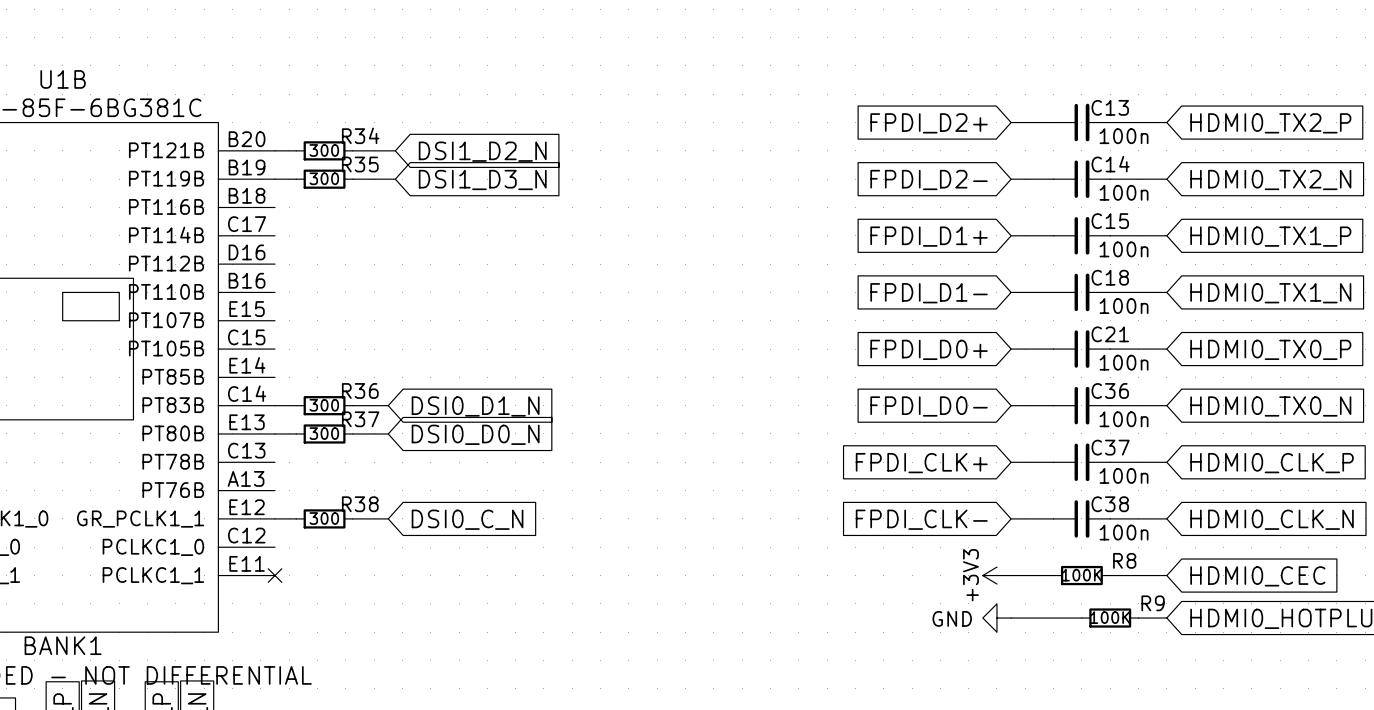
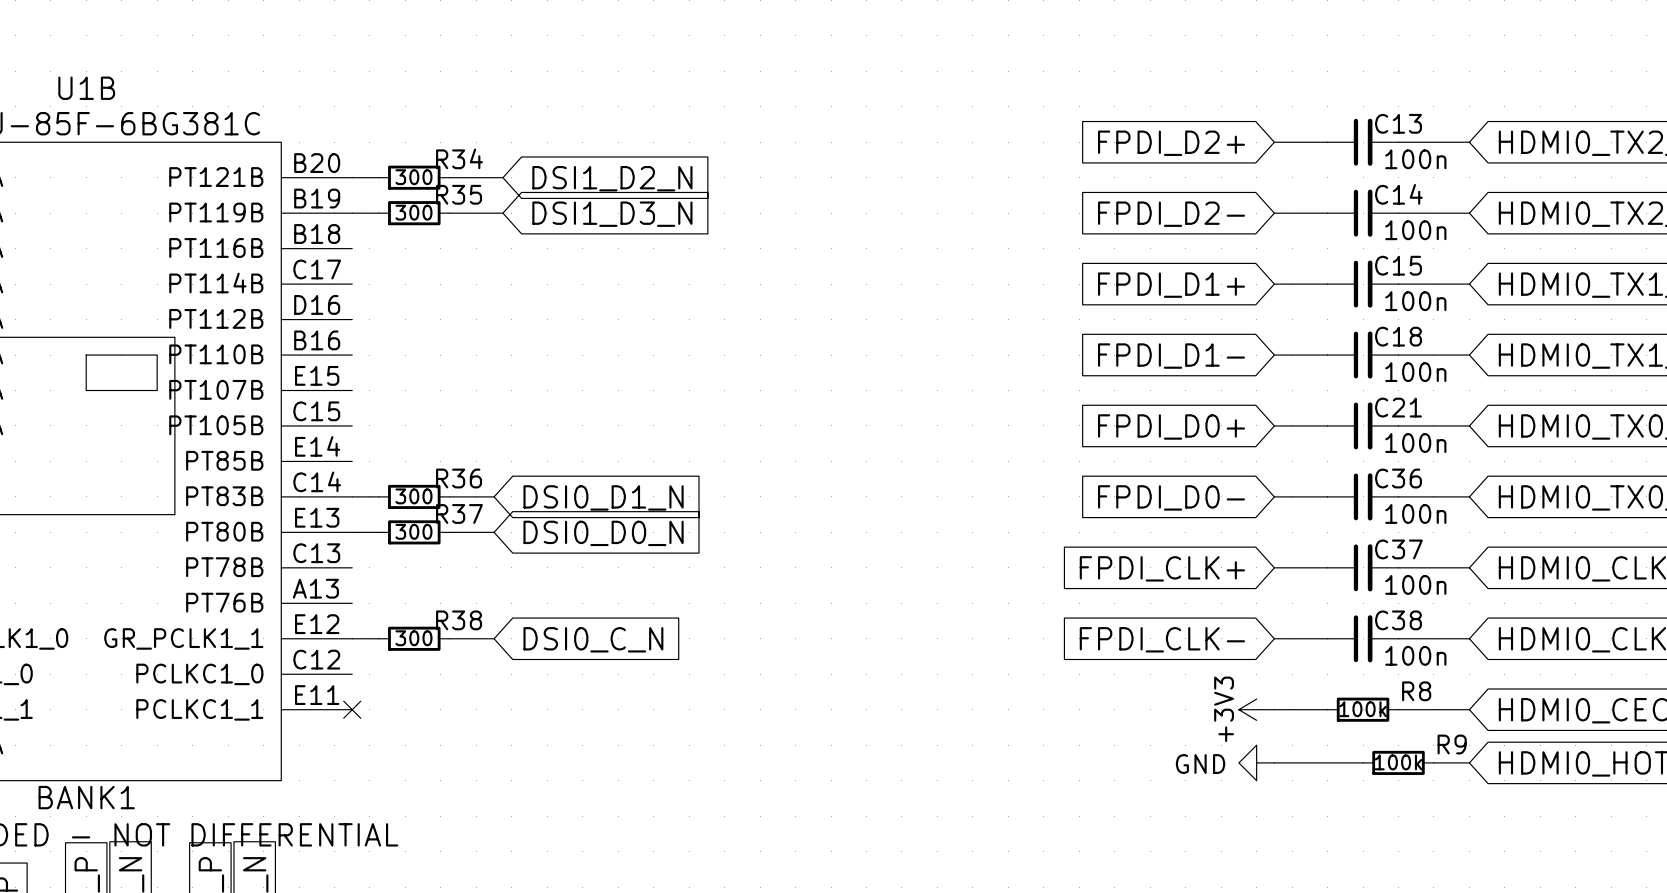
R8 value: 100K (1081, 575) -> 100k (1363, 709)
R9 value: 100K (1110, 617) -> 100k (1398, 762)

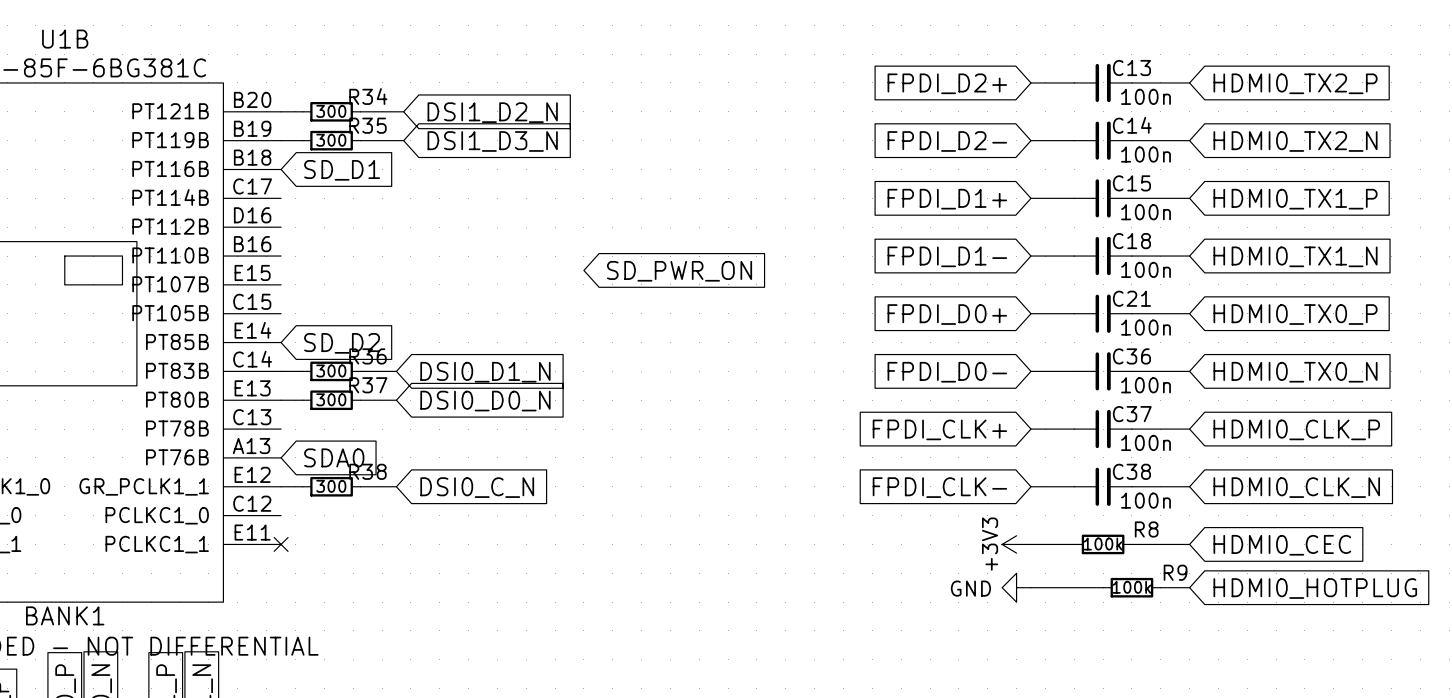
global label: none -> SD_D1 (342, 170)
global label: none -> SD_PWR_ON (679, 271)
global label: none -> SD_D2 (342, 343)
global label: none -> SDA0 (334, 457)

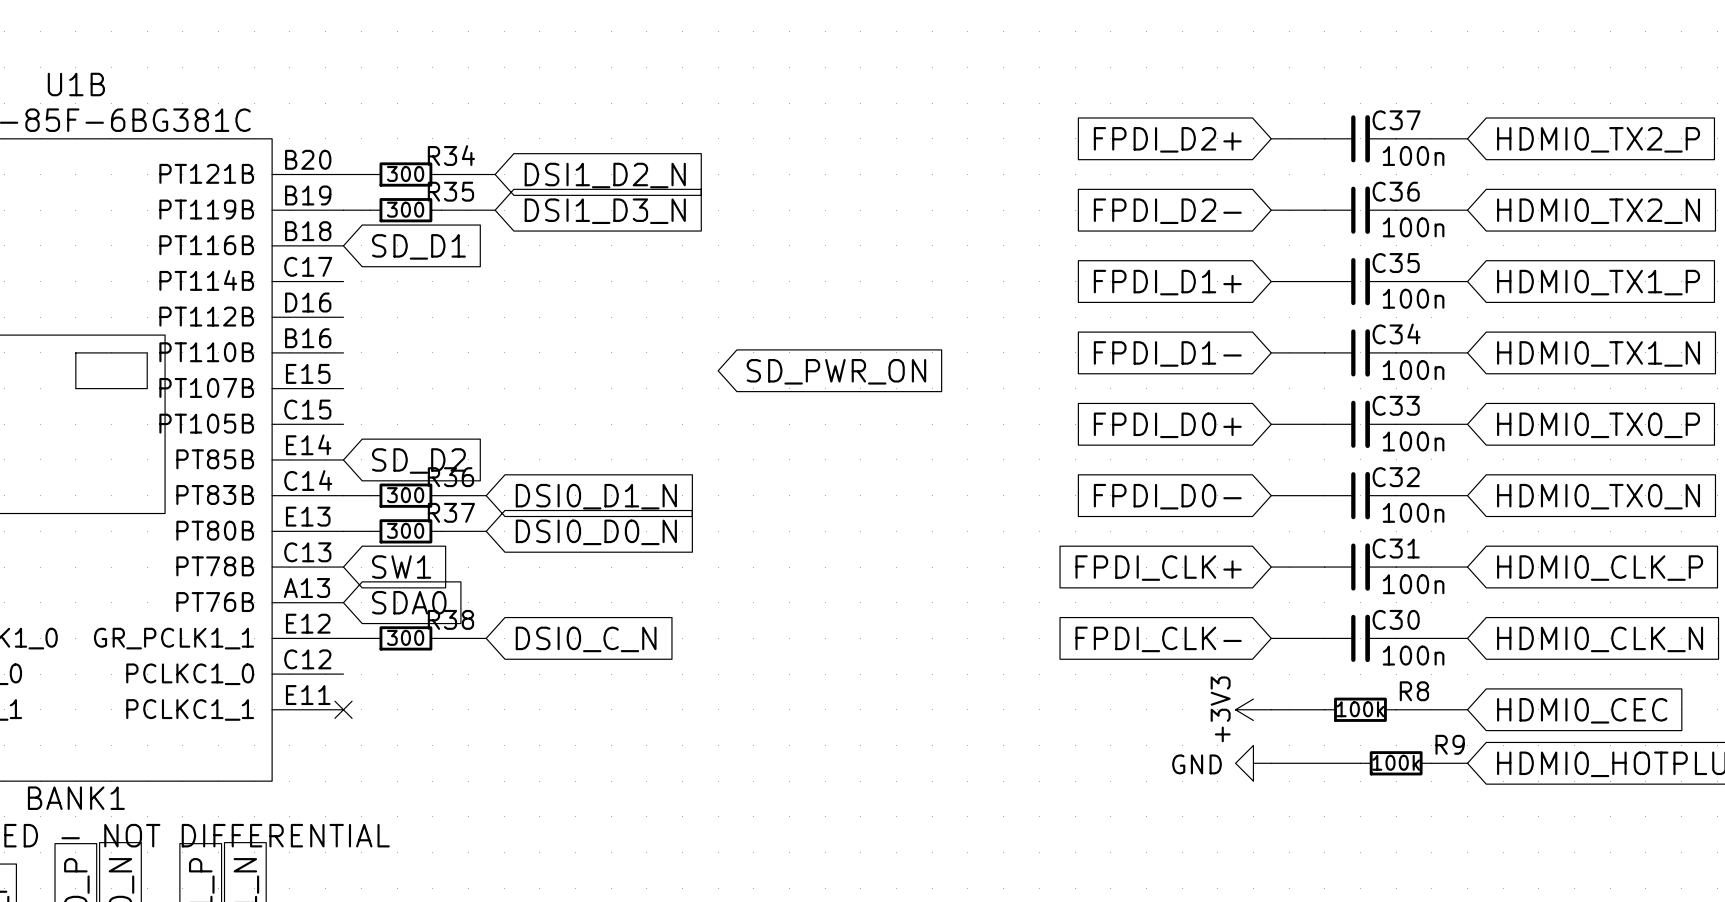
C13 name: C13 (1131, 68) -> C37 (1396, 120)
C14 name: C14 (1132, 125) -> C36 (1396, 191)
C15 name: C15 (1131, 183) -> C35 (1396, 263)
C18 name: C18 (1131, 241) -> C34 (1396, 333)
C21 name: C21 (1131, 298) -> C33 (1396, 405)
C36 name: C36 (1131, 356) -> C32 (1396, 477)
C37 name: C37 (1132, 414) -> C31 (1396, 548)
global label: none -> SW1 (401, 567)
C38 name: C38 (1131, 471) -> C30 (1396, 619)

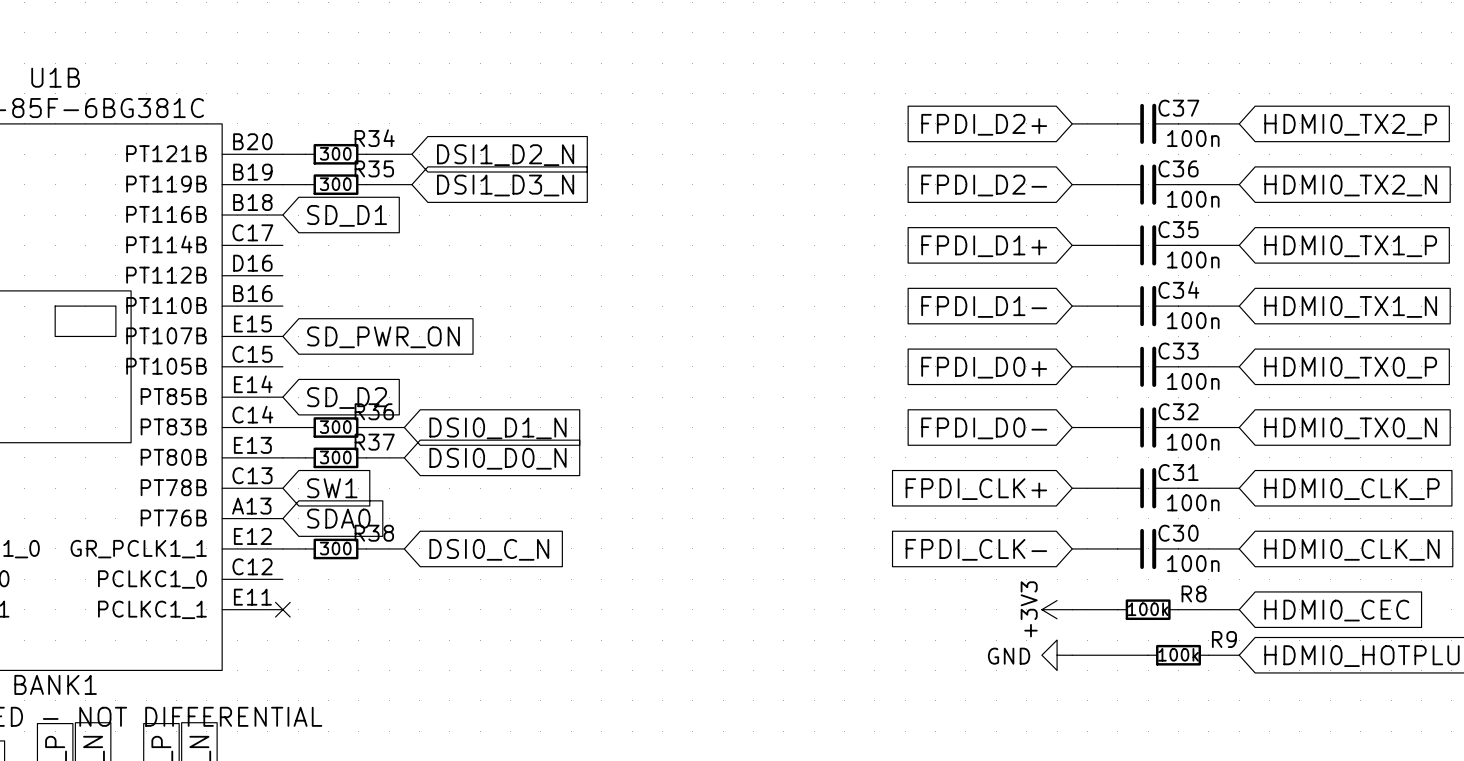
global label: SD_PWR_ON (836, 371) -> none
global label: none -> SD_PWR_ON (383, 337)

